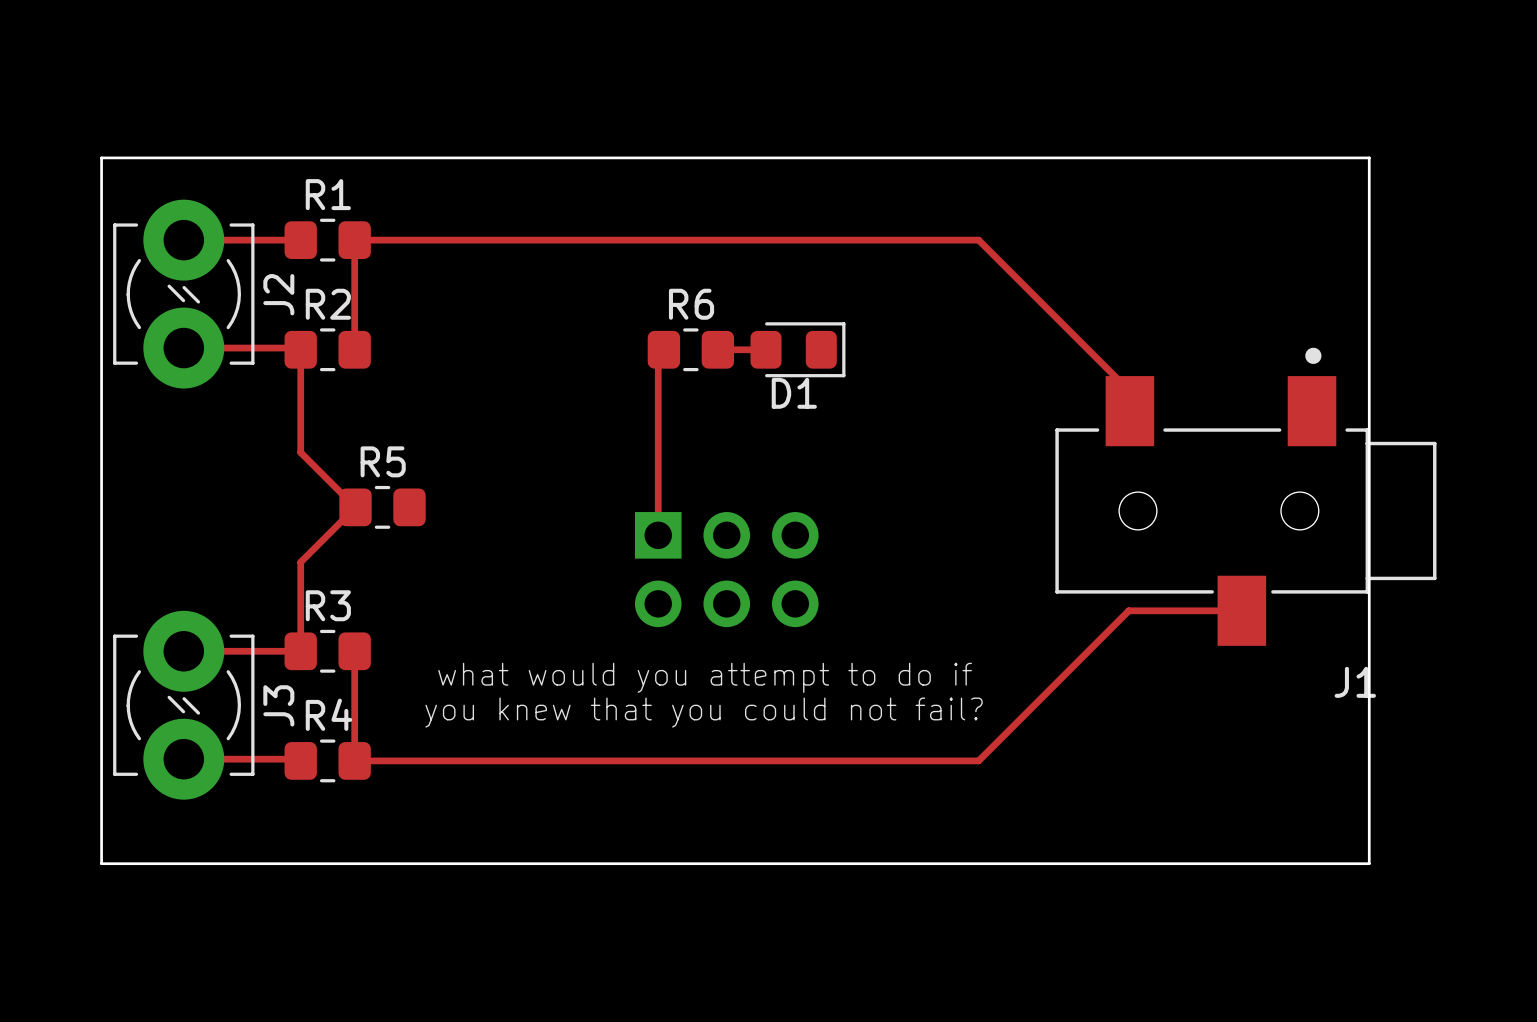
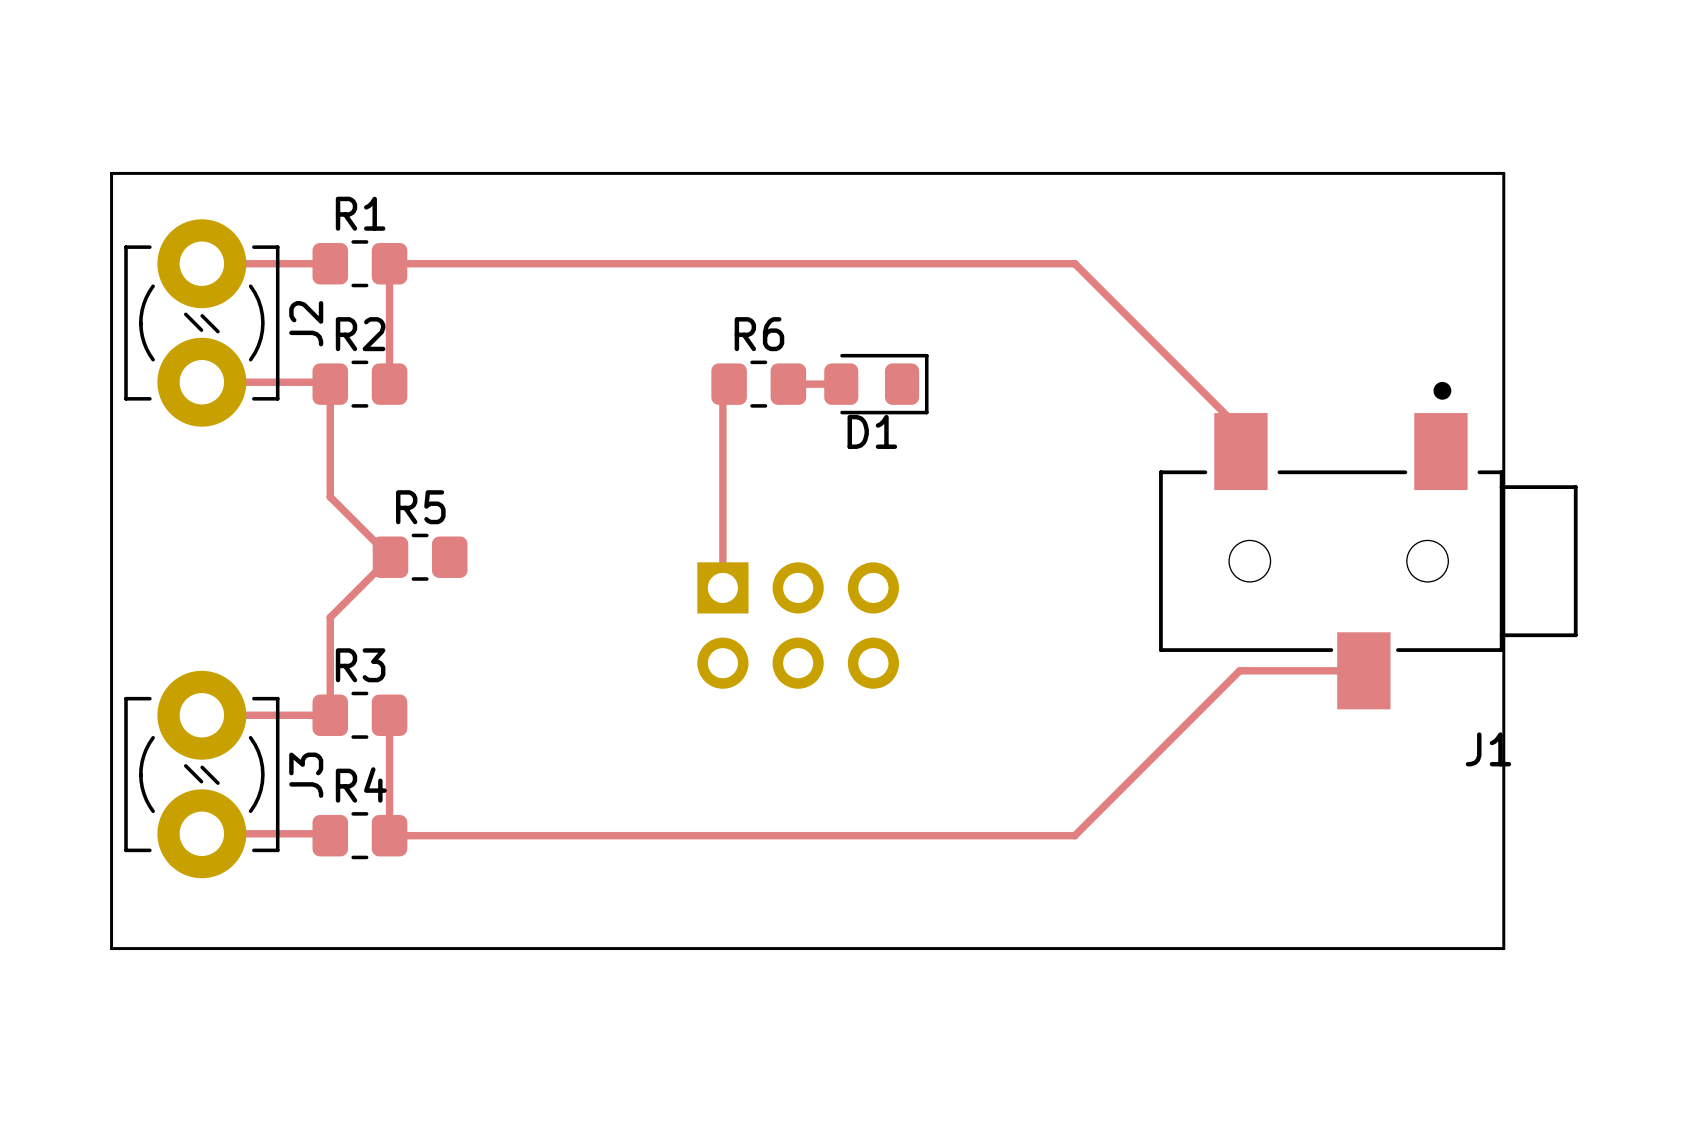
text: what would you attempt to do if (705, 677) -> none
text: you knew that you could not fail? (704, 712) -> none

